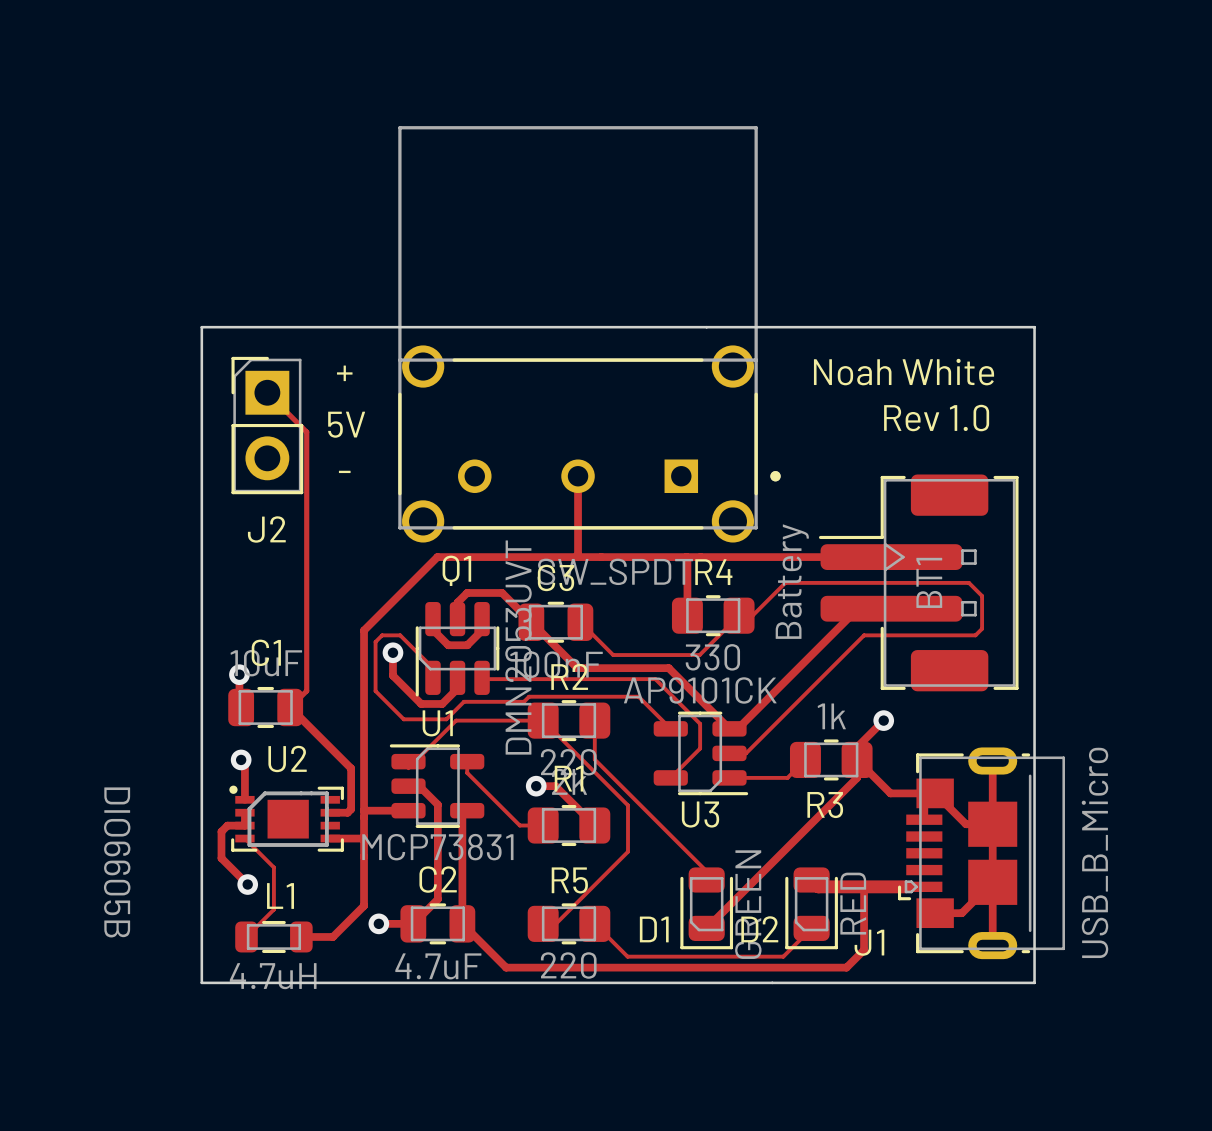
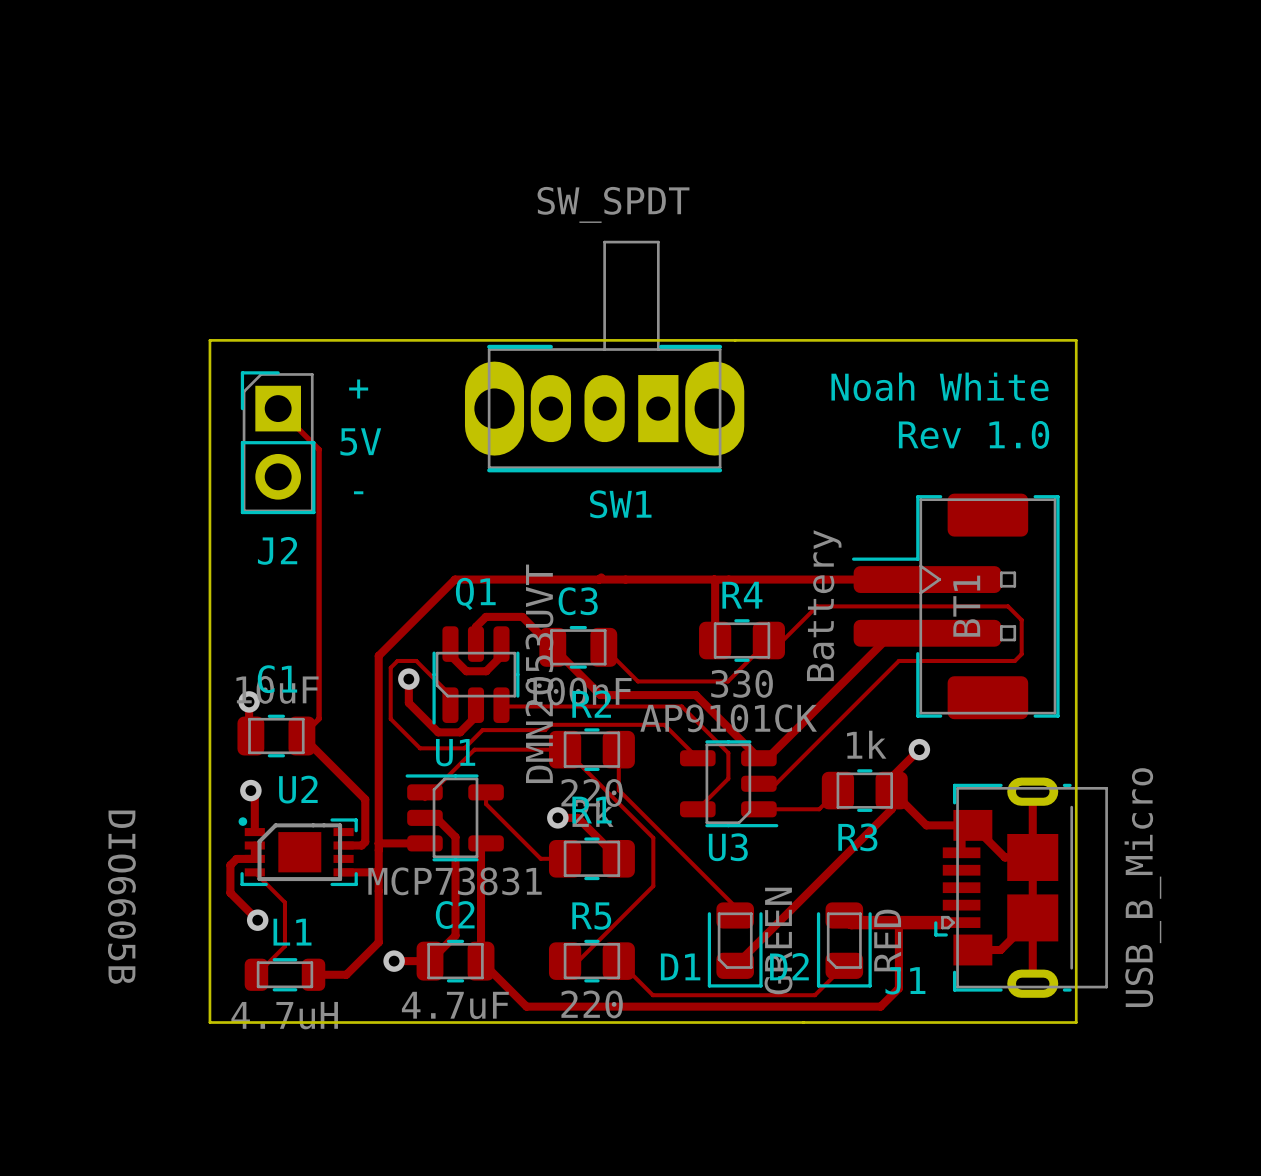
part: SW_SPDT (589, 334) -> none
SW1: none -> SW_SPDT (604, 356)
track: (578, 476) (578, 555) -> none

